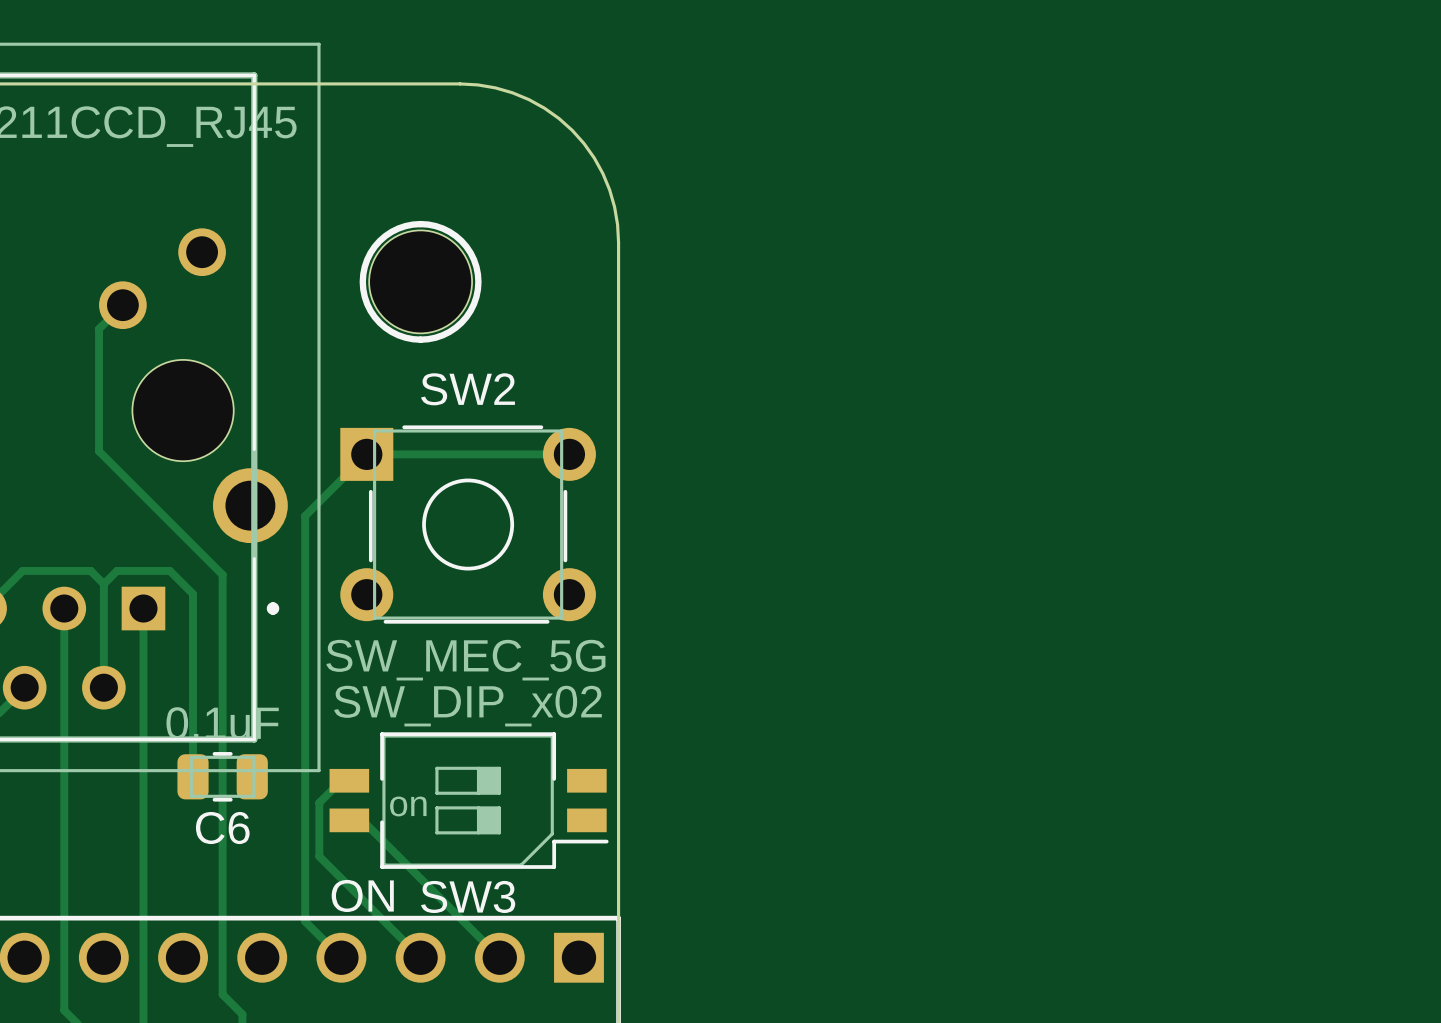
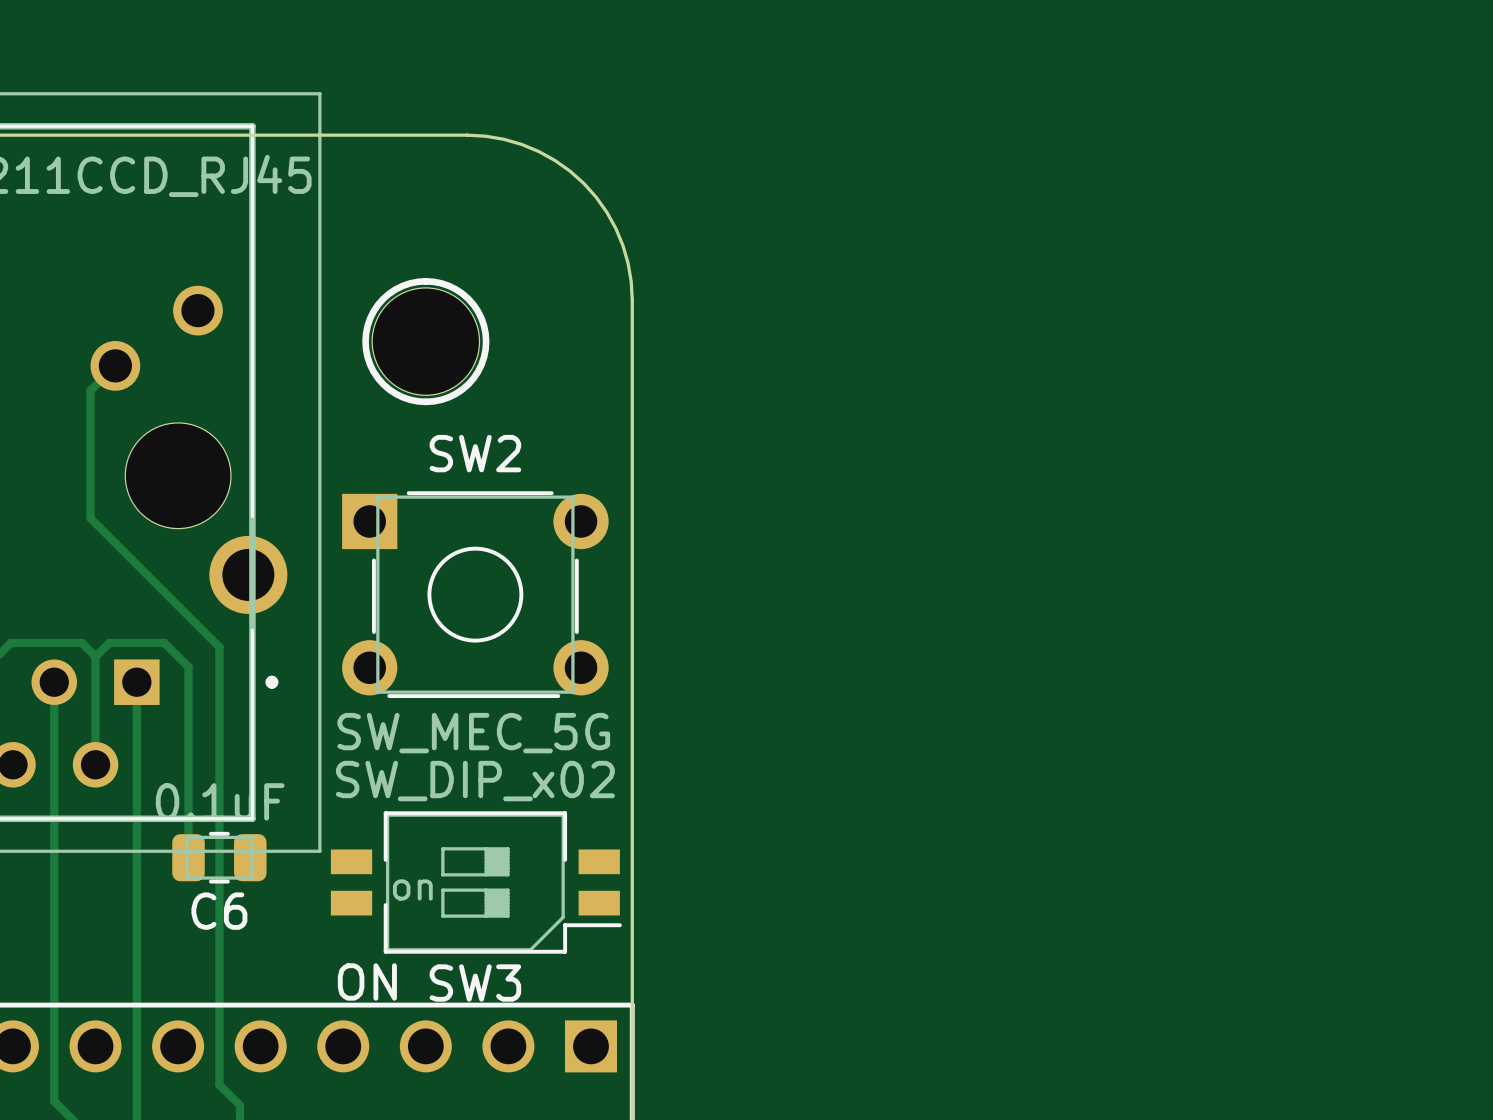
track: (569, 454) (366, 454) (305, 515) (305, 921) (341, 957) -> none
track: (349, 780) (341, 780) (319, 802) (319, 856) (420, 957) -> none
track: (349, 820) (362, 820) (499, 957) -> none

